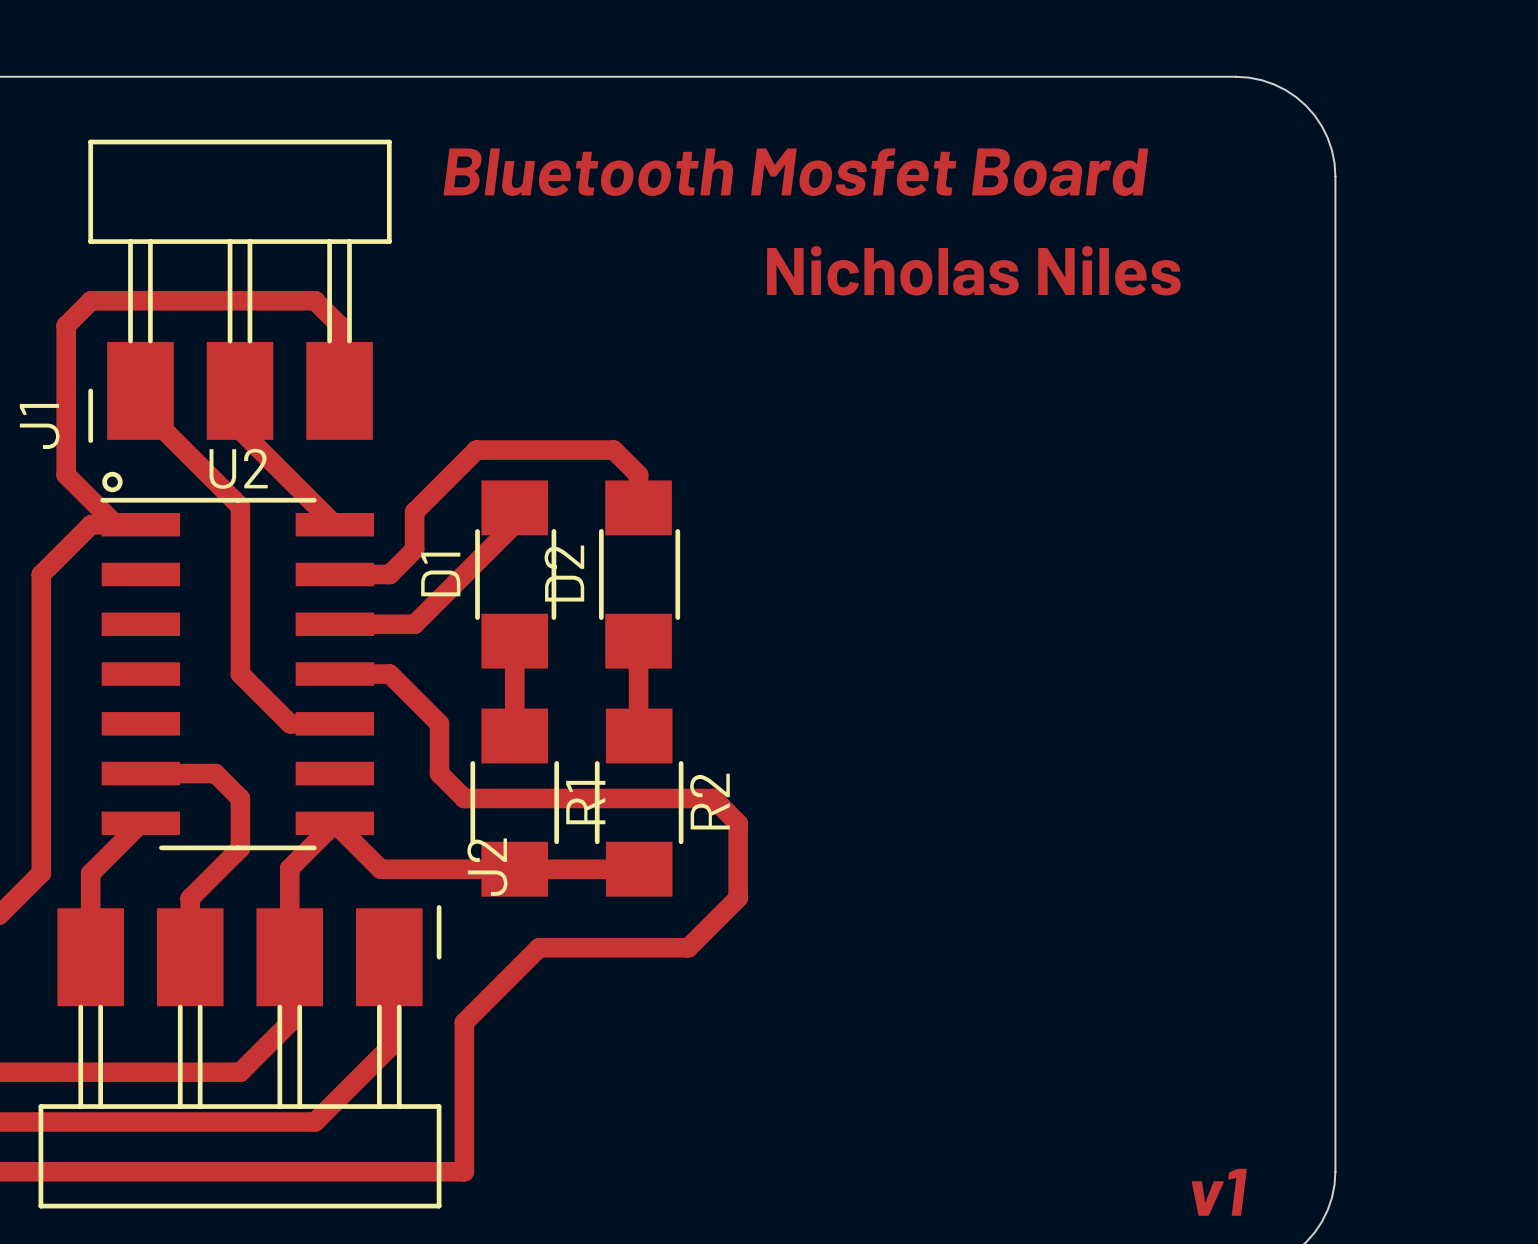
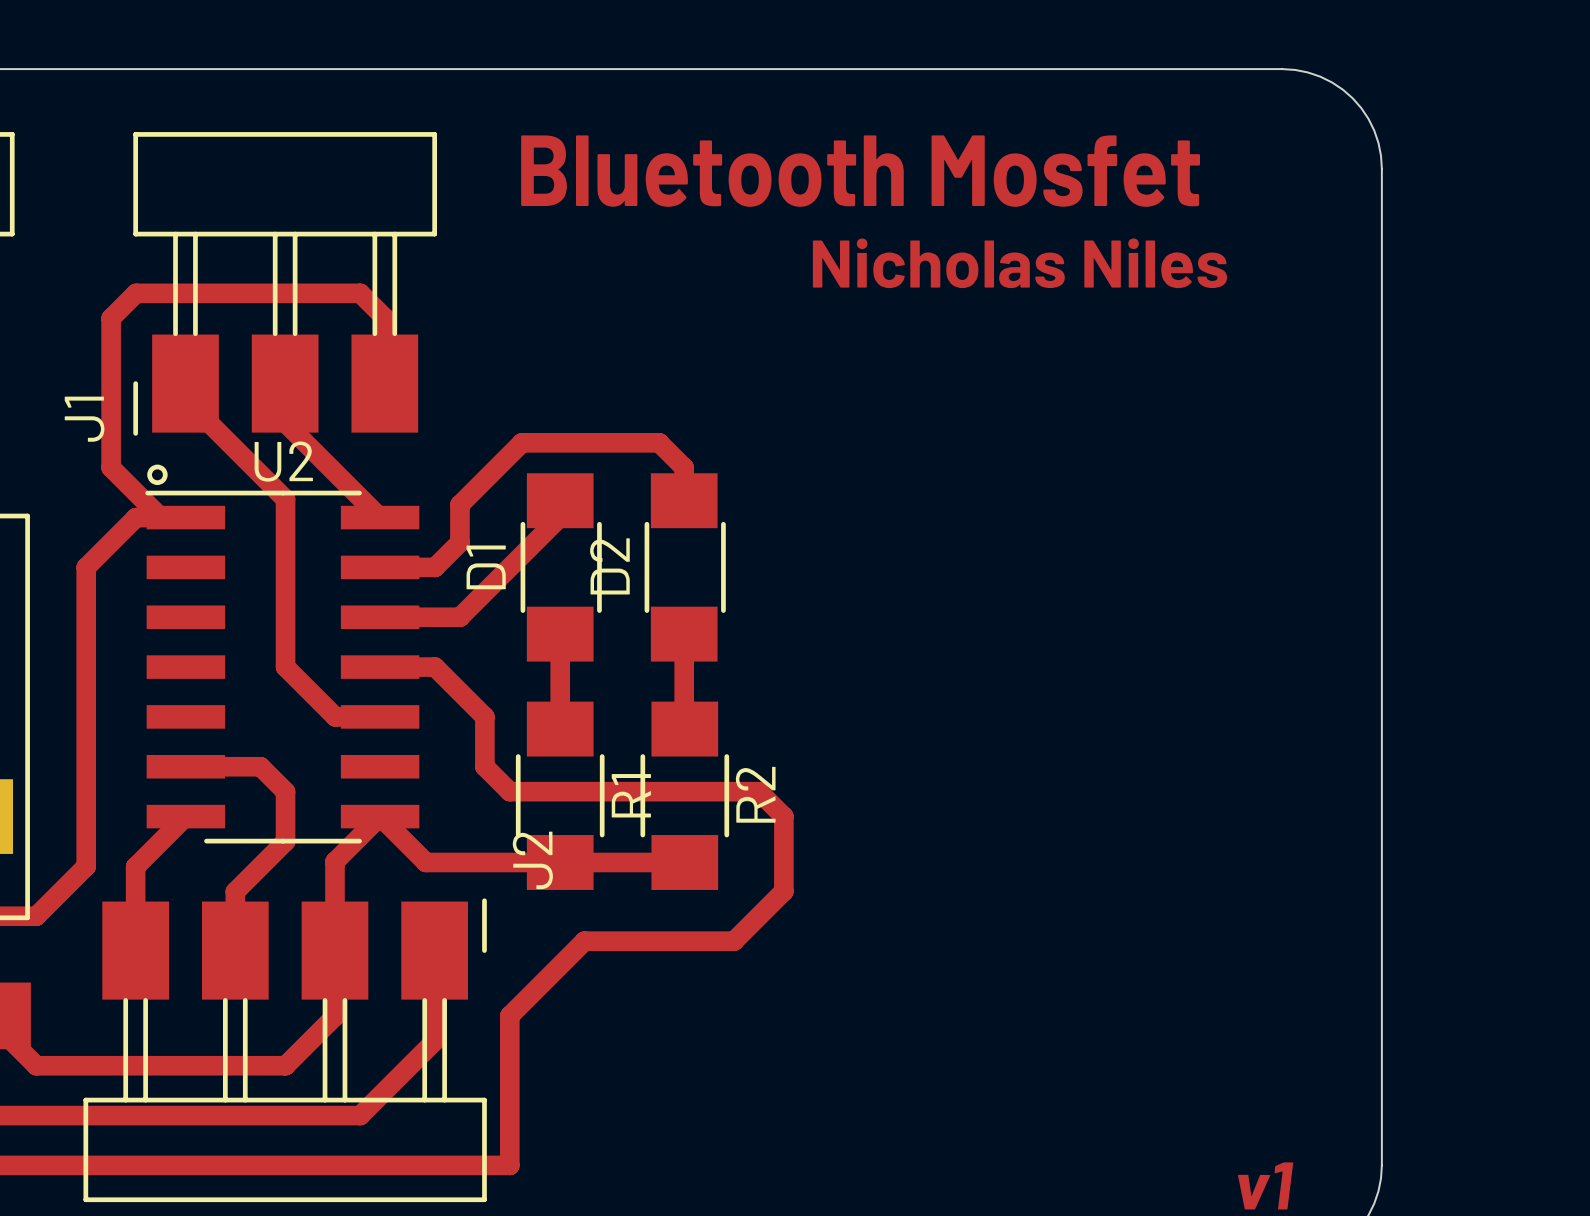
text: Bluetooth Mosfet Board (795, 172) -> Bluetooth Mosfet (860, 171)

